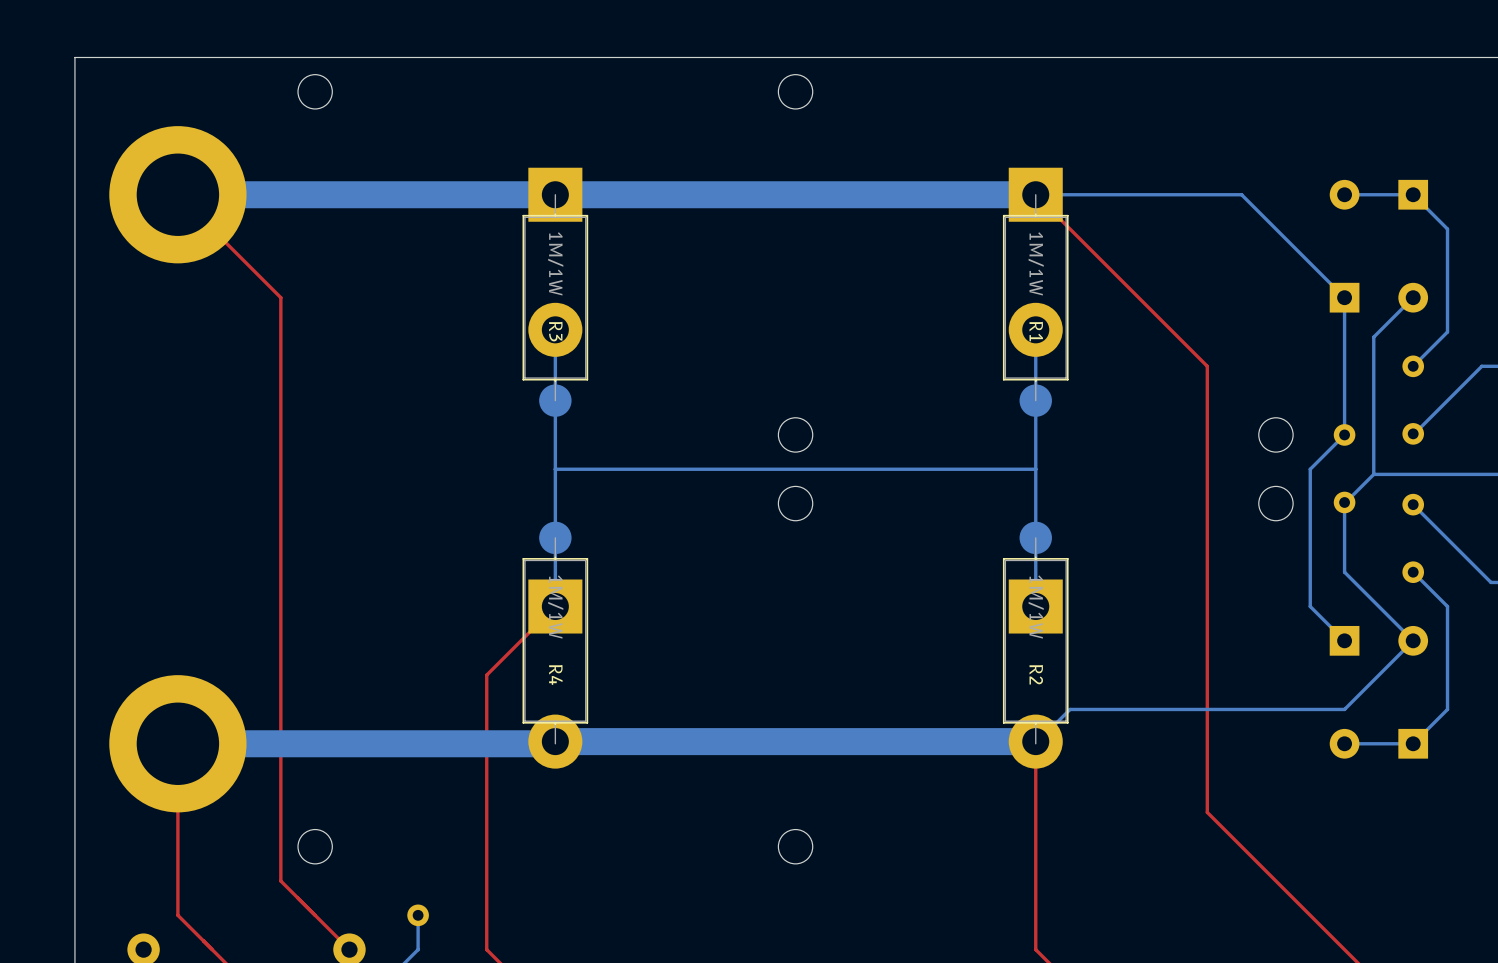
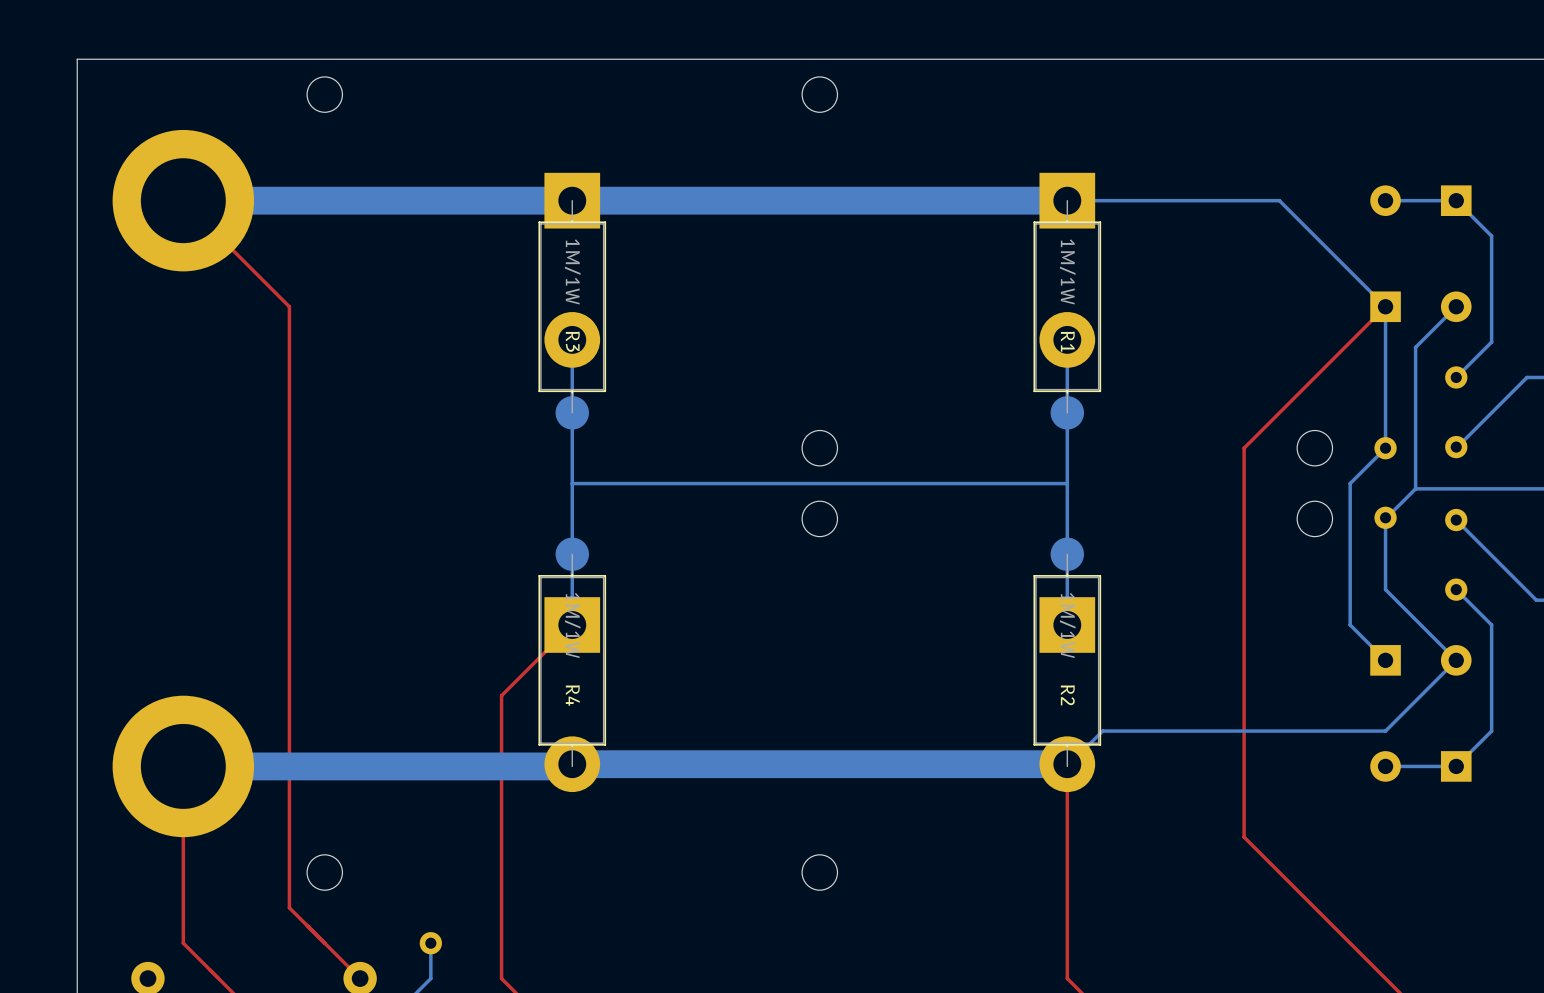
top track: (1035, 194) (1207, 366) (1207, 434) -> (1385, 306) (1244, 448)

